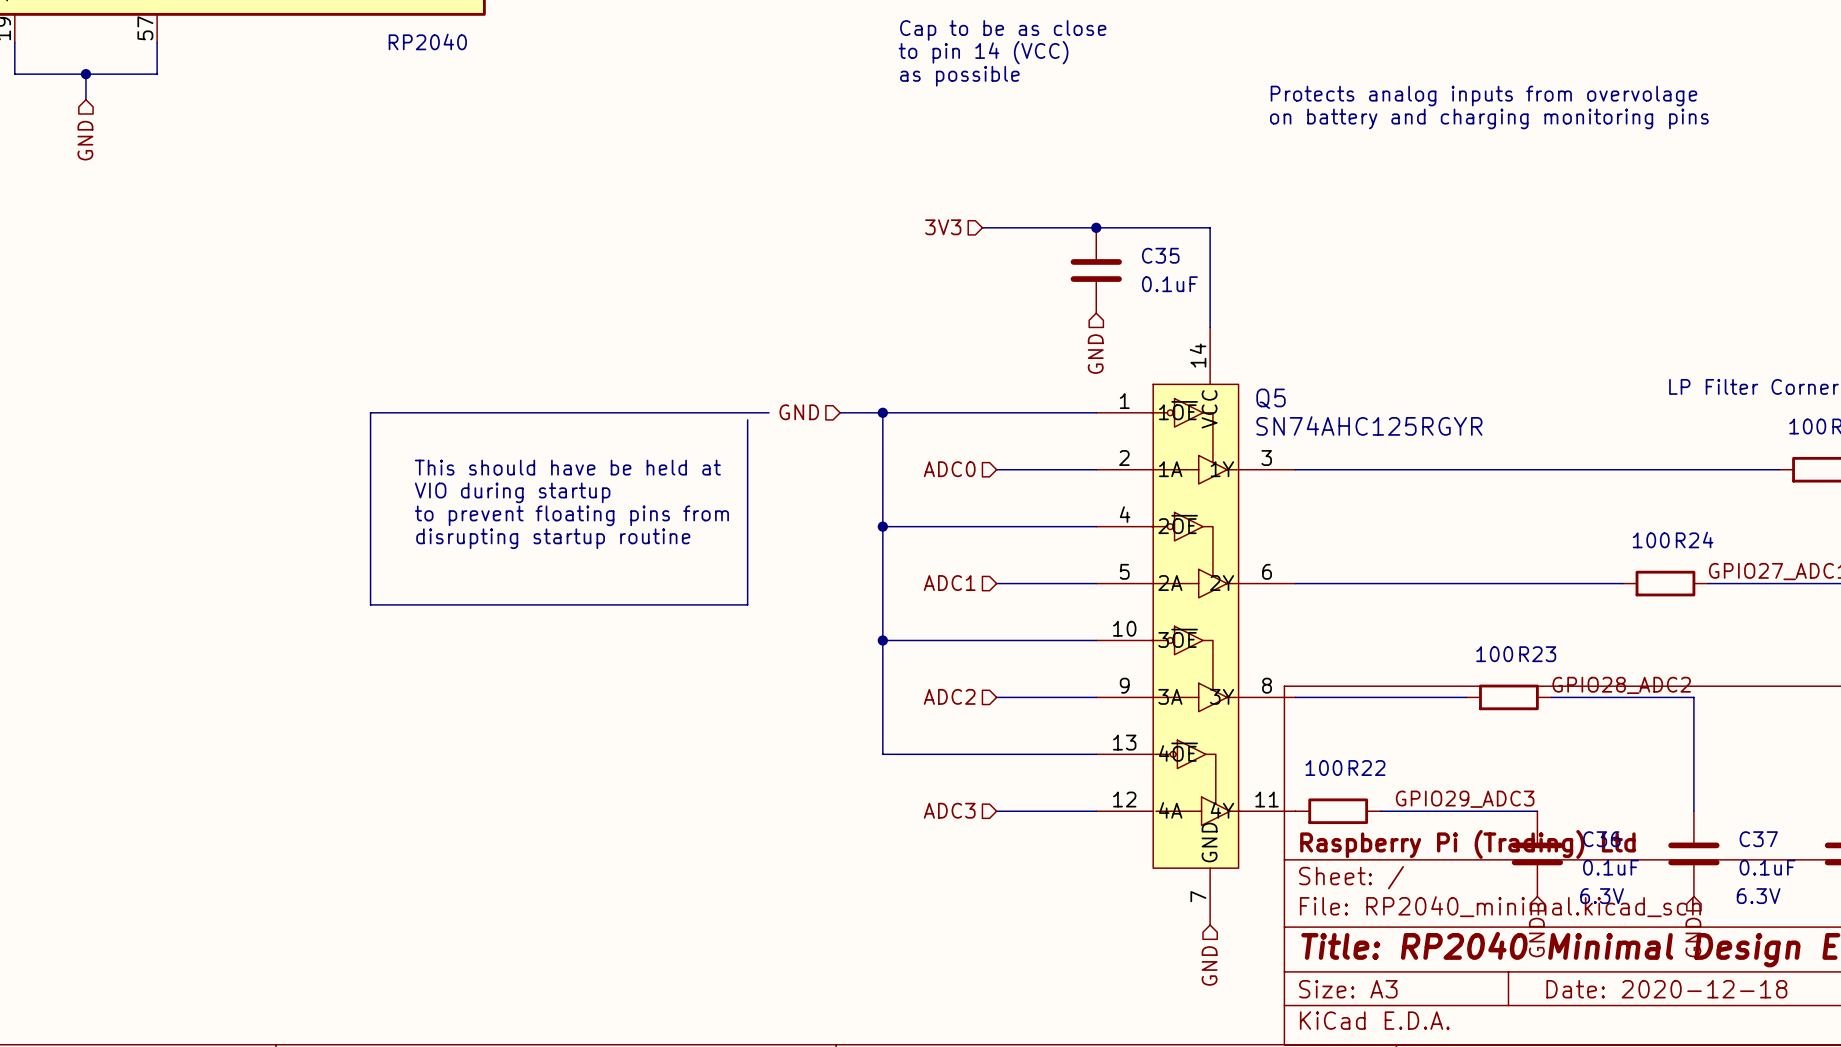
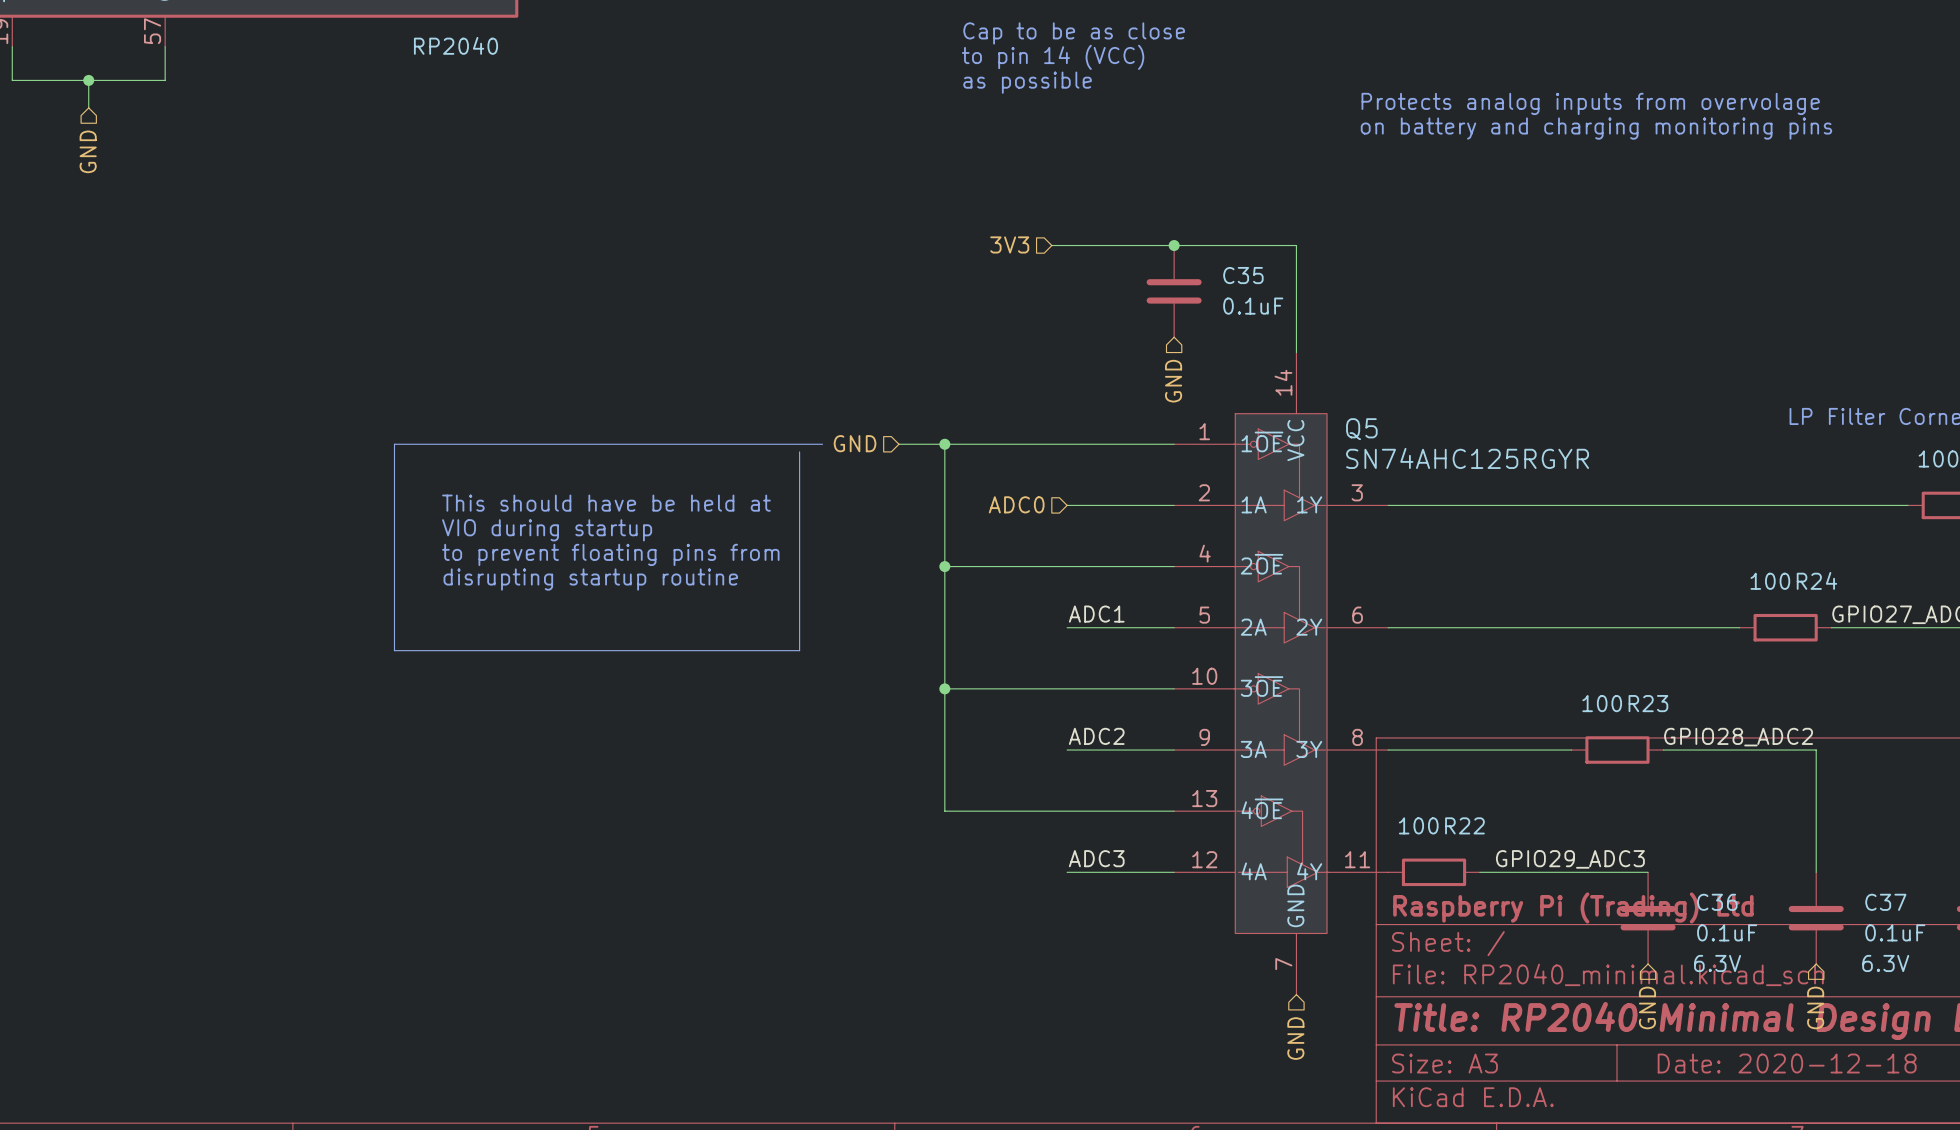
label: none -> ADC1 (1096, 614)
hierarchical label: ADC1 (949, 583) -> none
label: none -> ADC2 (1096, 736)
hierarchical label: ADC2 (949, 696) -> none
label: none -> ADC3 (1096, 858)
hierarchical label: ADC3 (949, 810) -> none

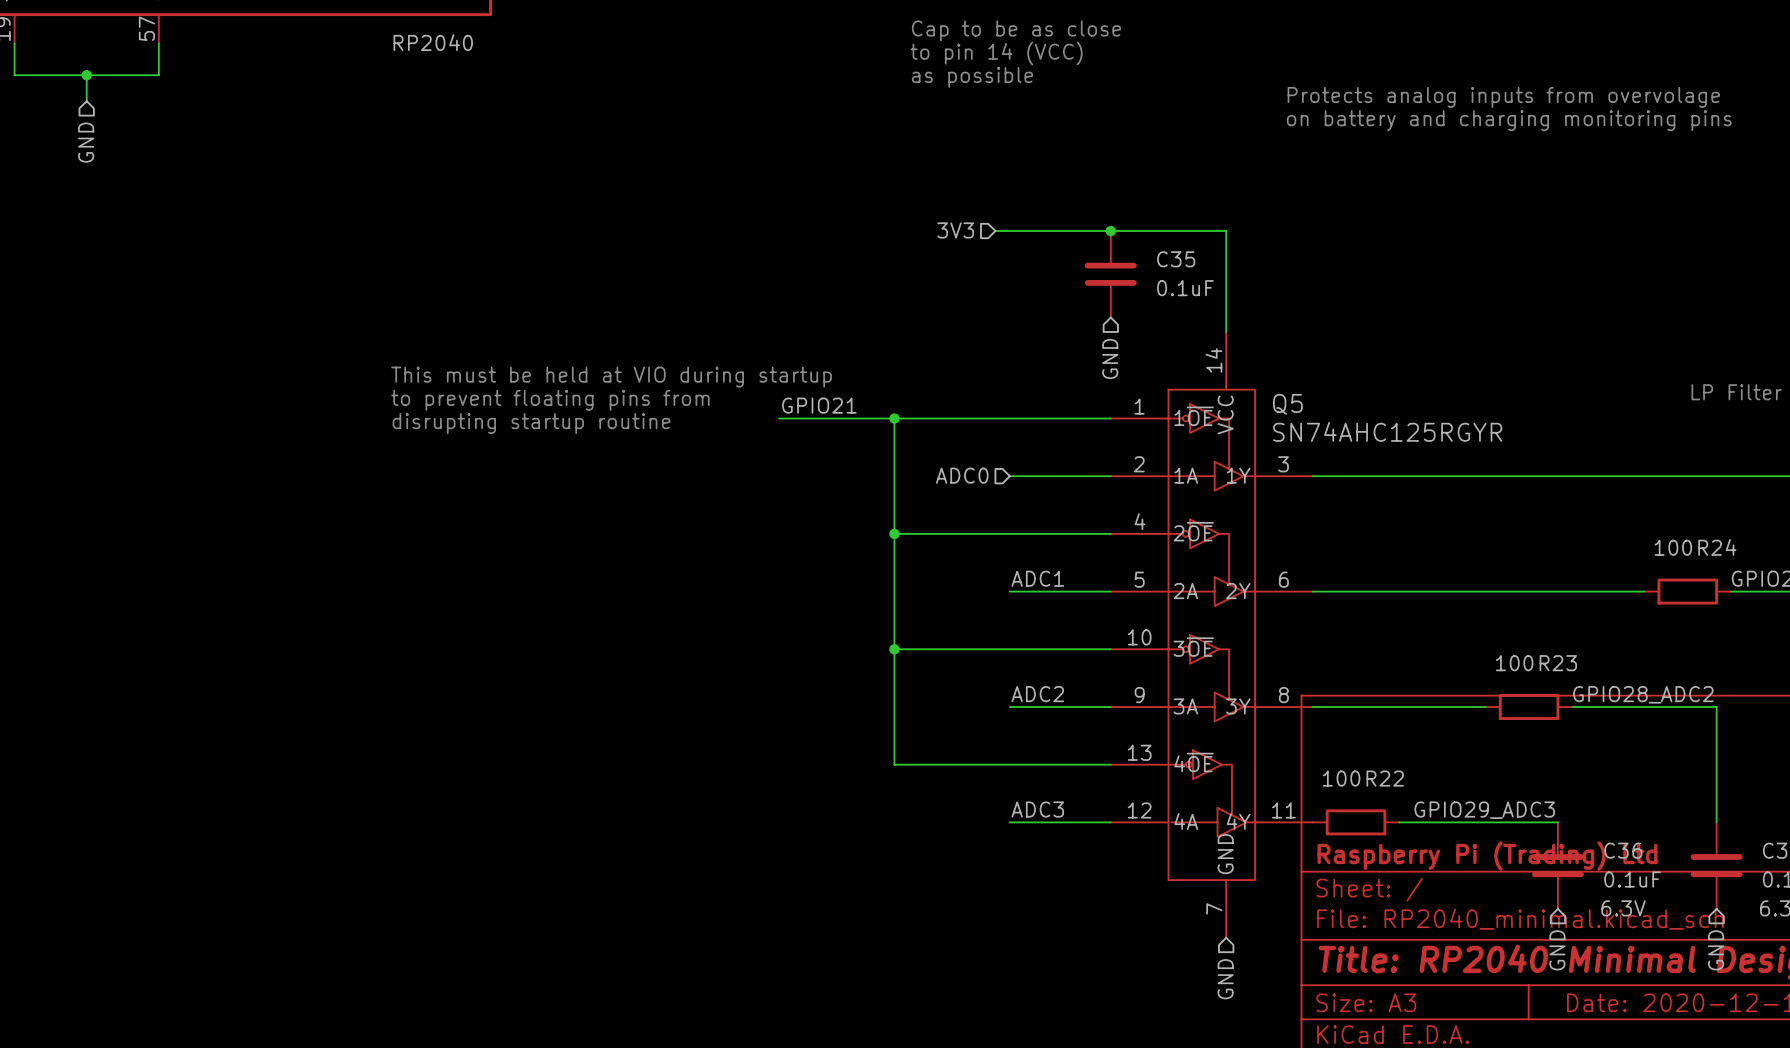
text: none -> This must be held at VIO during startup (611, 377)
label: none -> GPIO21 (819, 405)
hierarchical label: GND (855, 443) -> none
wire: none -> (779, 418) (851, 418)
line: (822, 444) (394, 444) (394, 650) (799, 650) (799, 451) -> none
text: This should have be held at (606, 503) -> none
text: VIO during startup (547, 530) -> none
text position: to prevent floating pins from (610, 554) -> to prevent floating pins from (550, 400)
text position: disrupting startup routine (590, 579) -> disrupting startup routine (531, 423)

